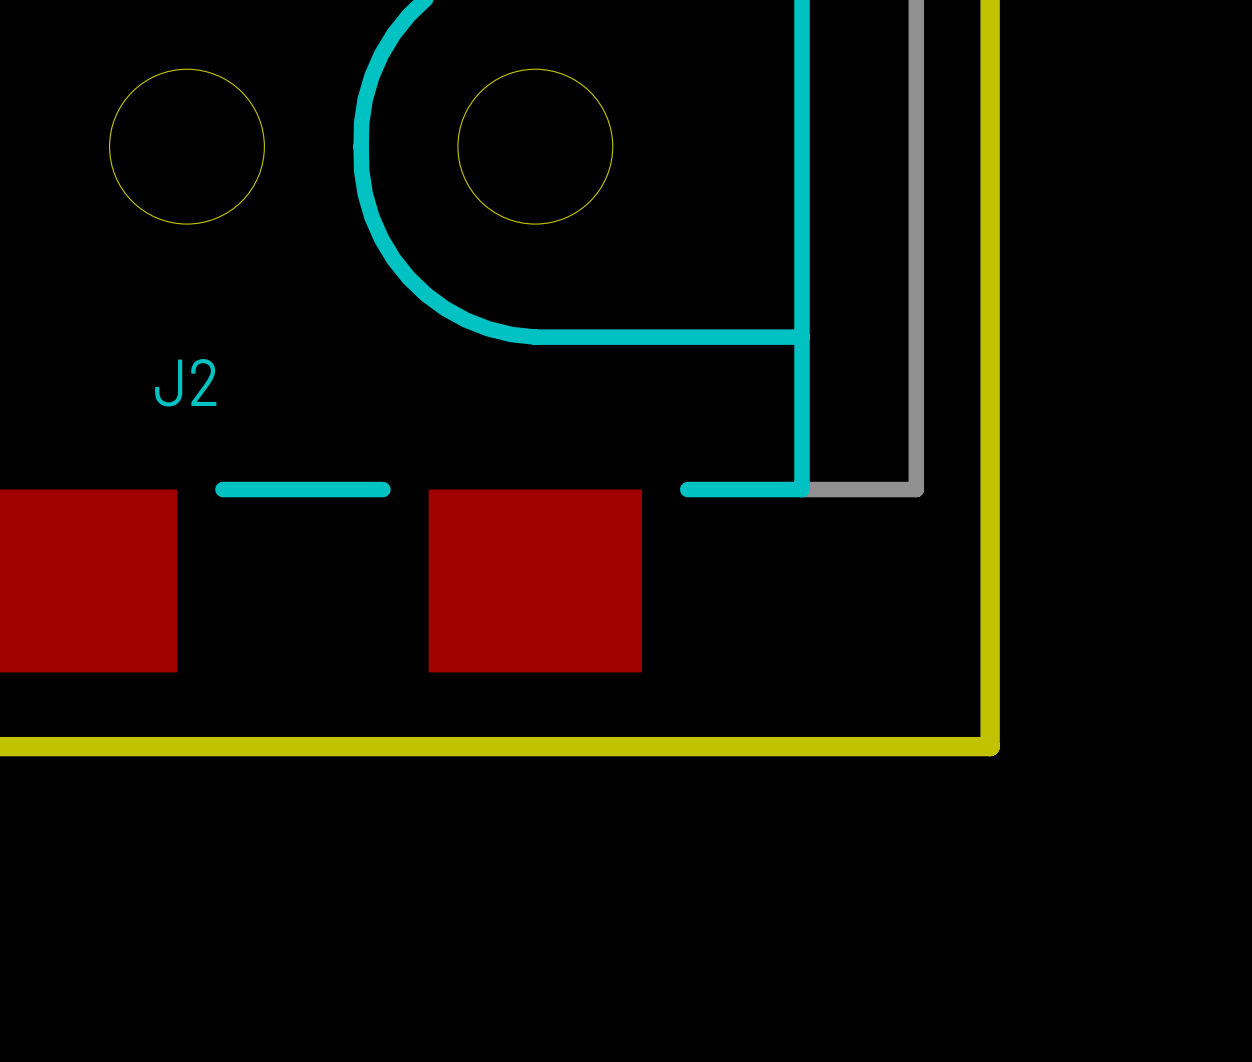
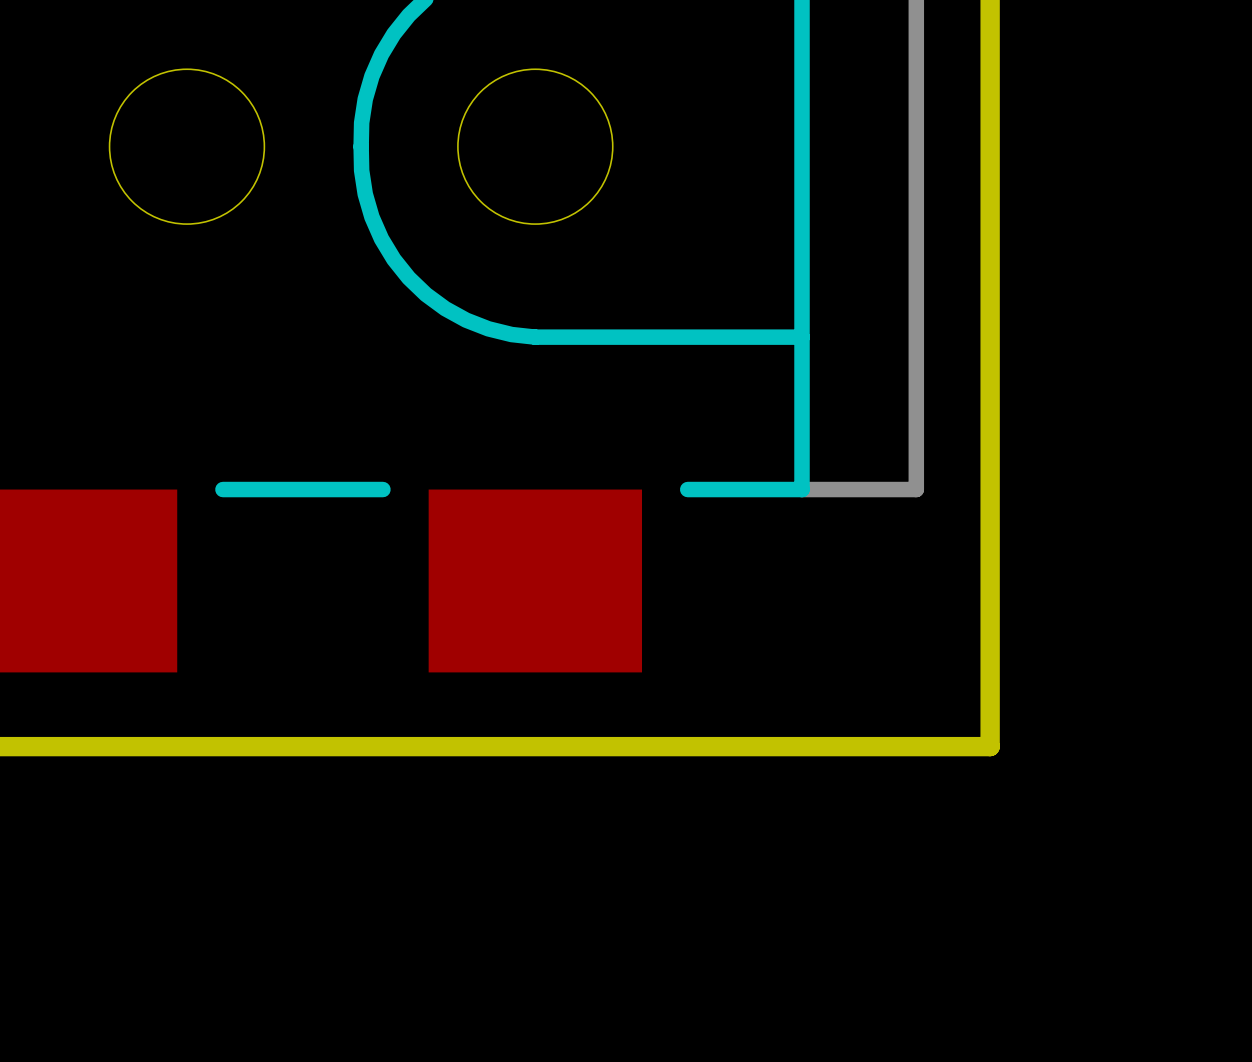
J2 name: J2 (185, 382) -> none

